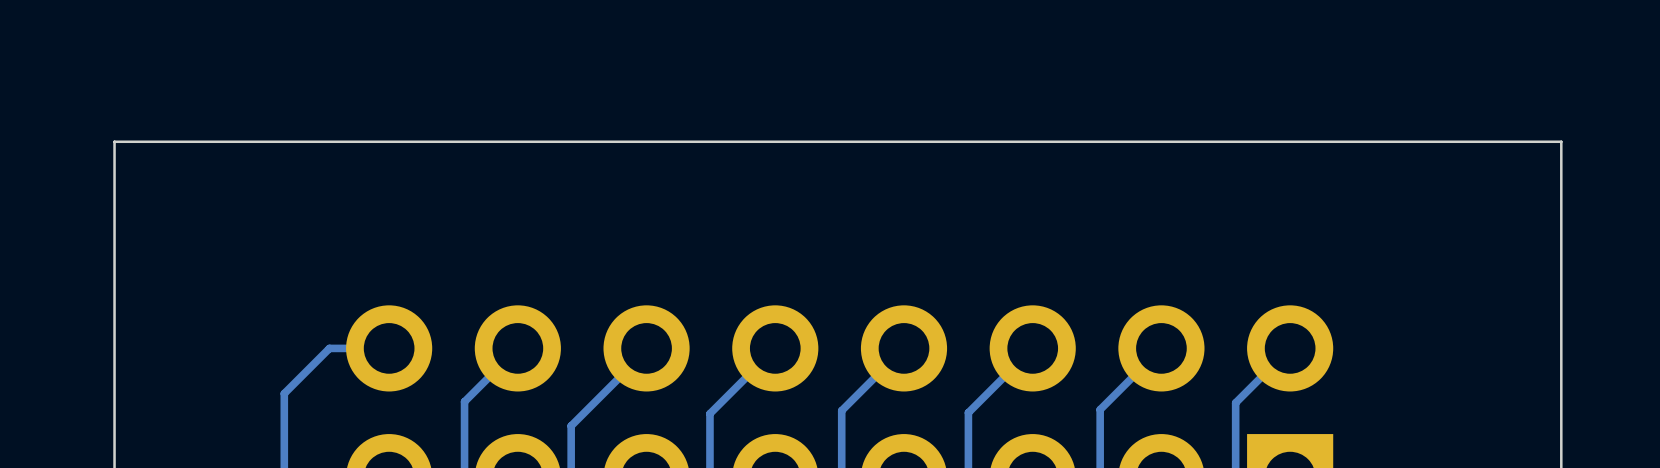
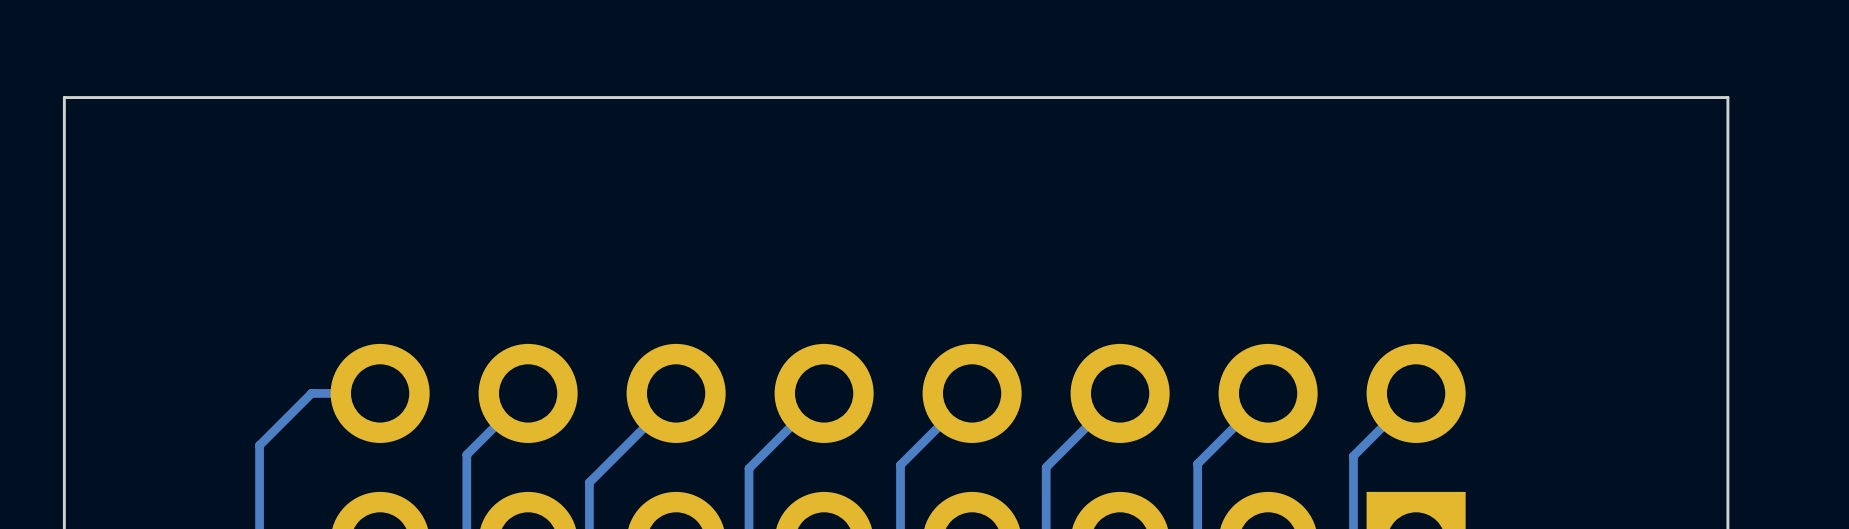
board edge: (1561, 141) (114, 141) -> (1727, 155) (1727, 97) (64, 97) (64, 155)

